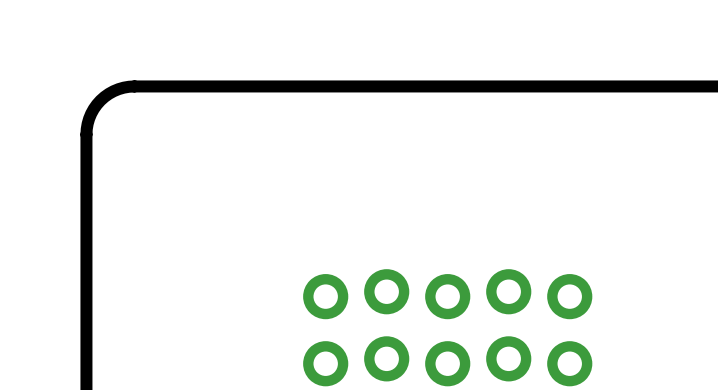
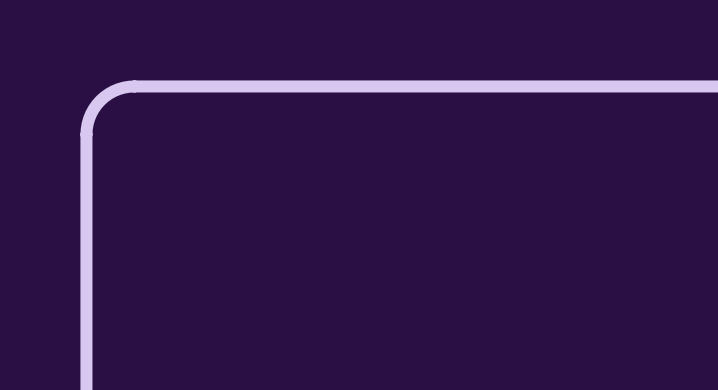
part: (447, 327) -> none

